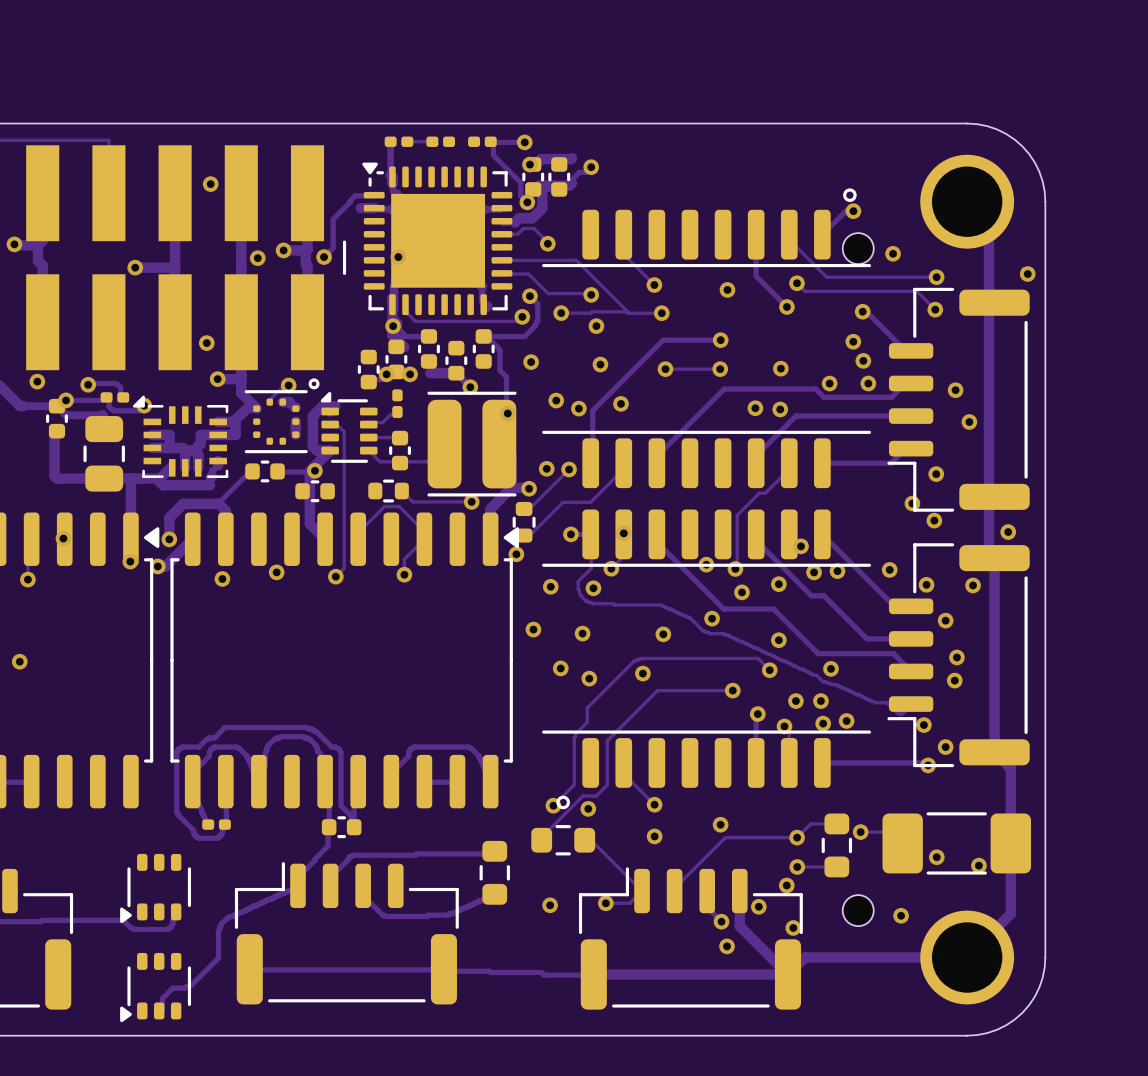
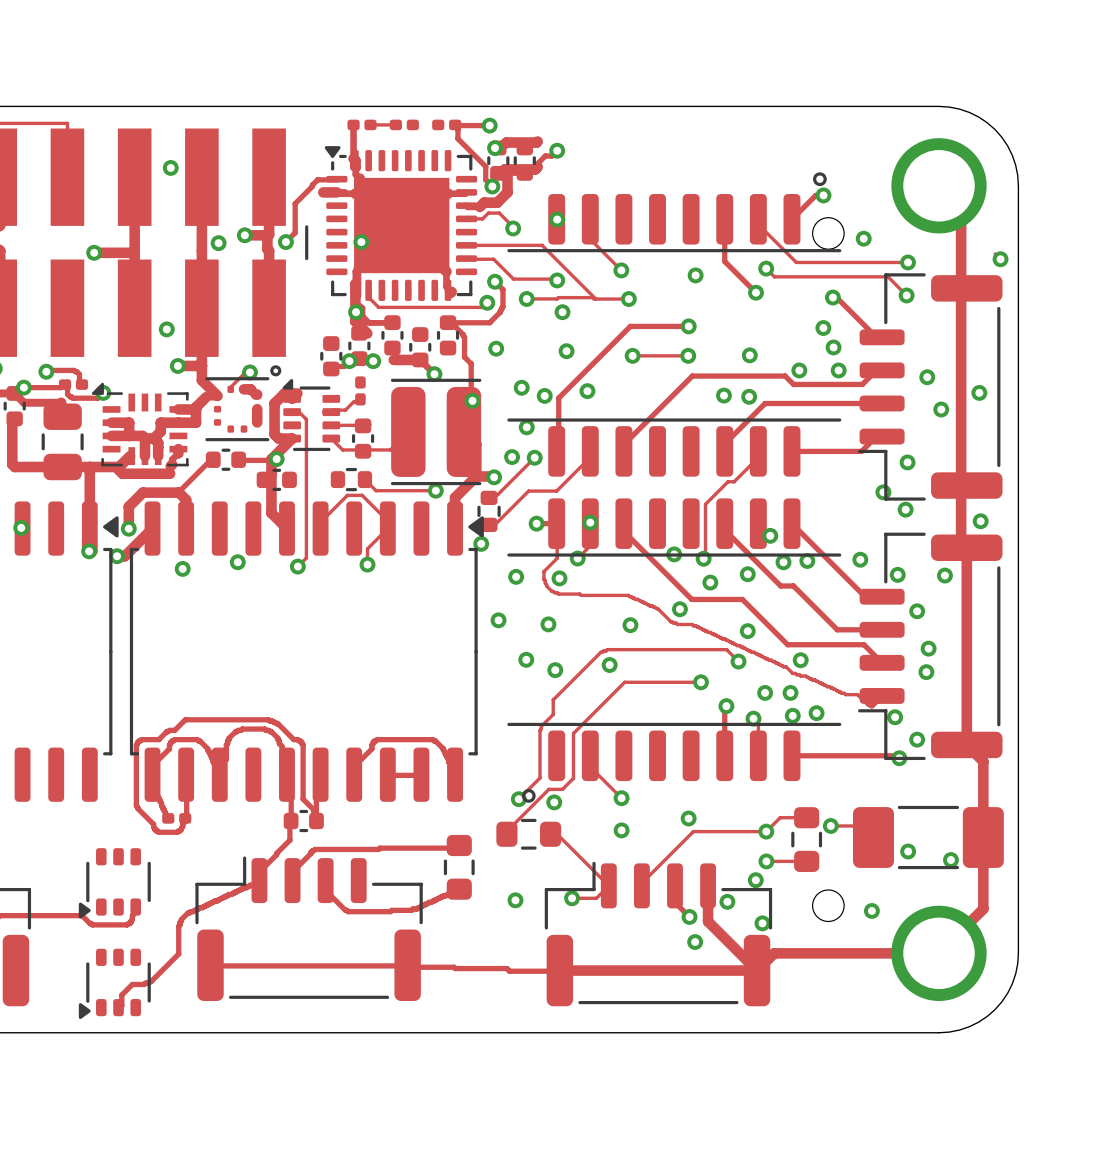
via: none -> (557, 219)
via: none -> (979, 392)
via: none -> (526, 427)

